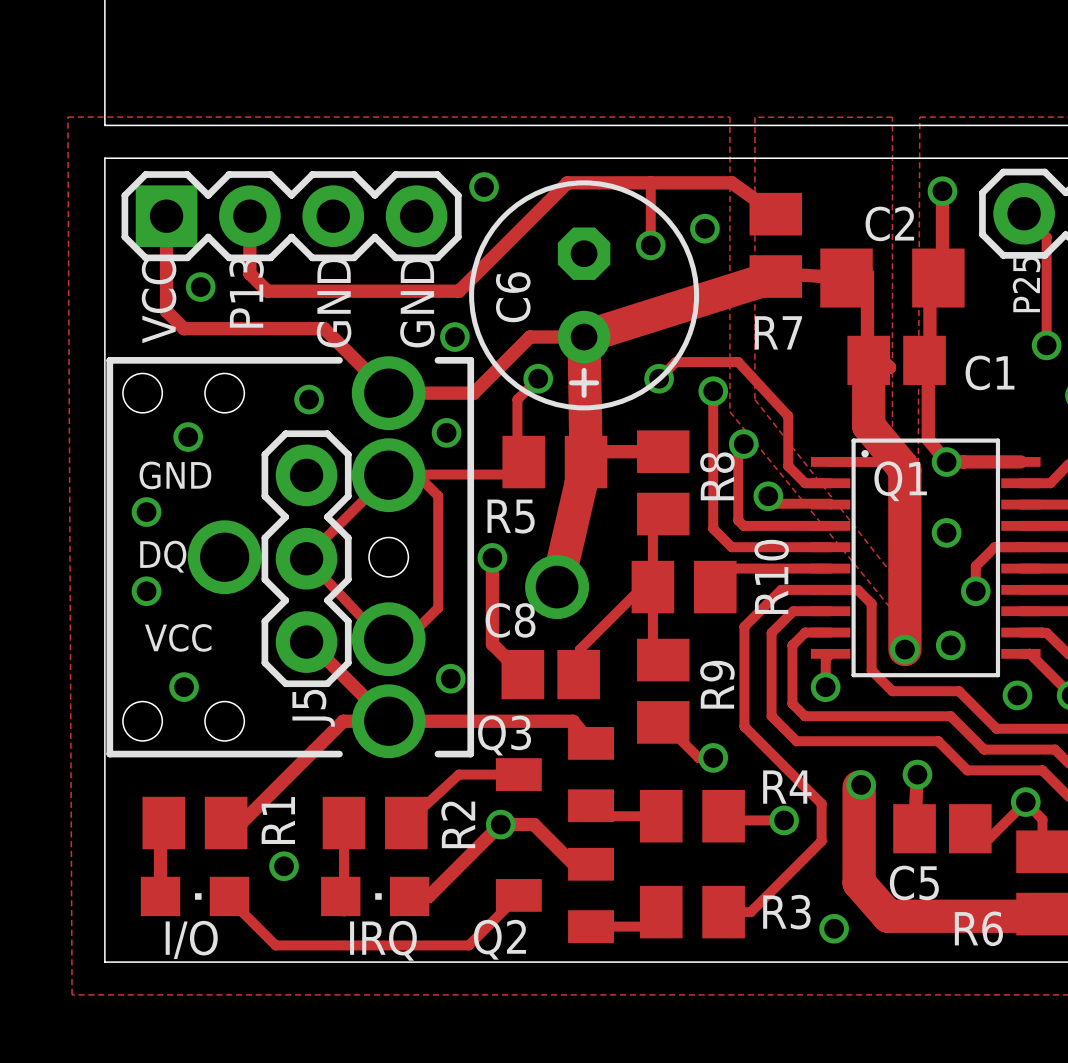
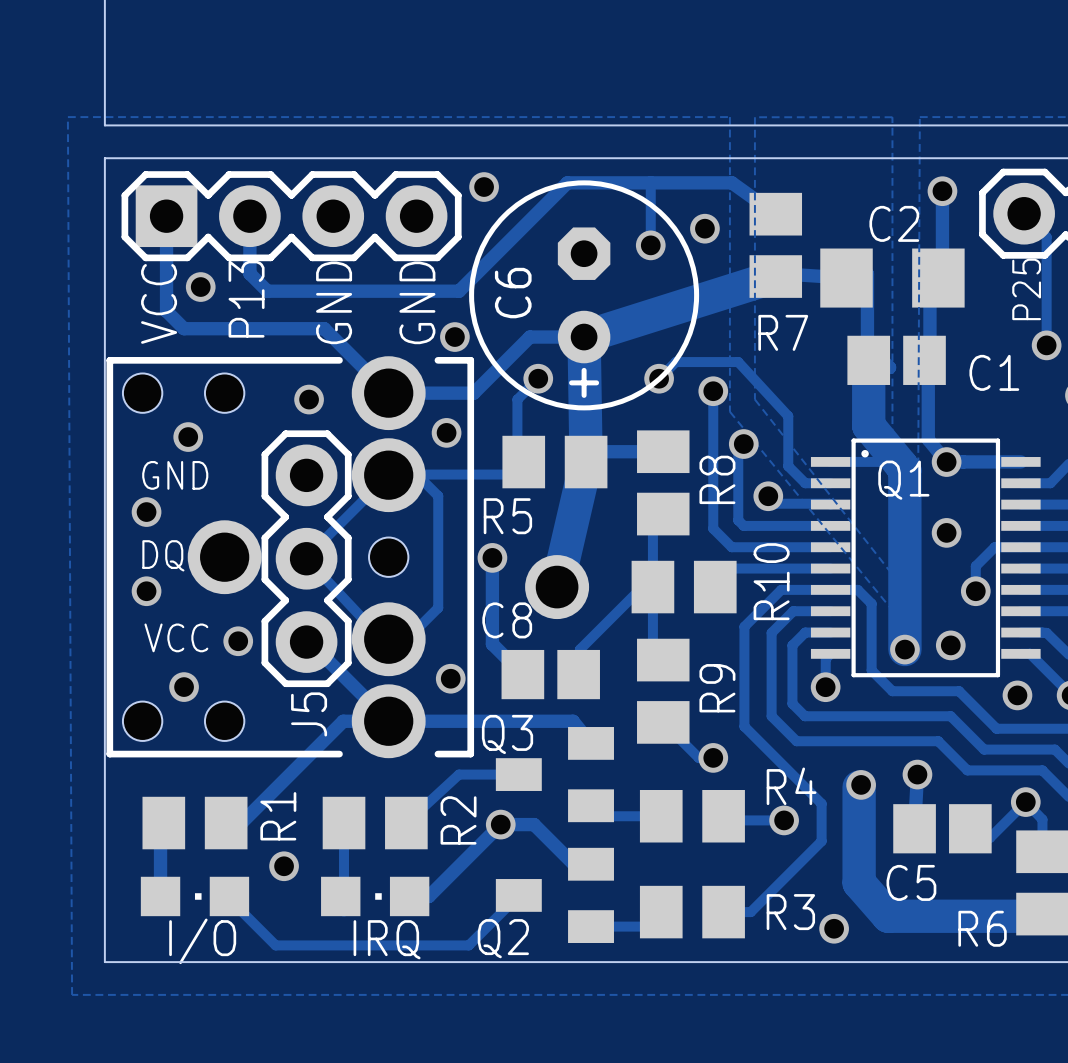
via: none -> (238, 641)

